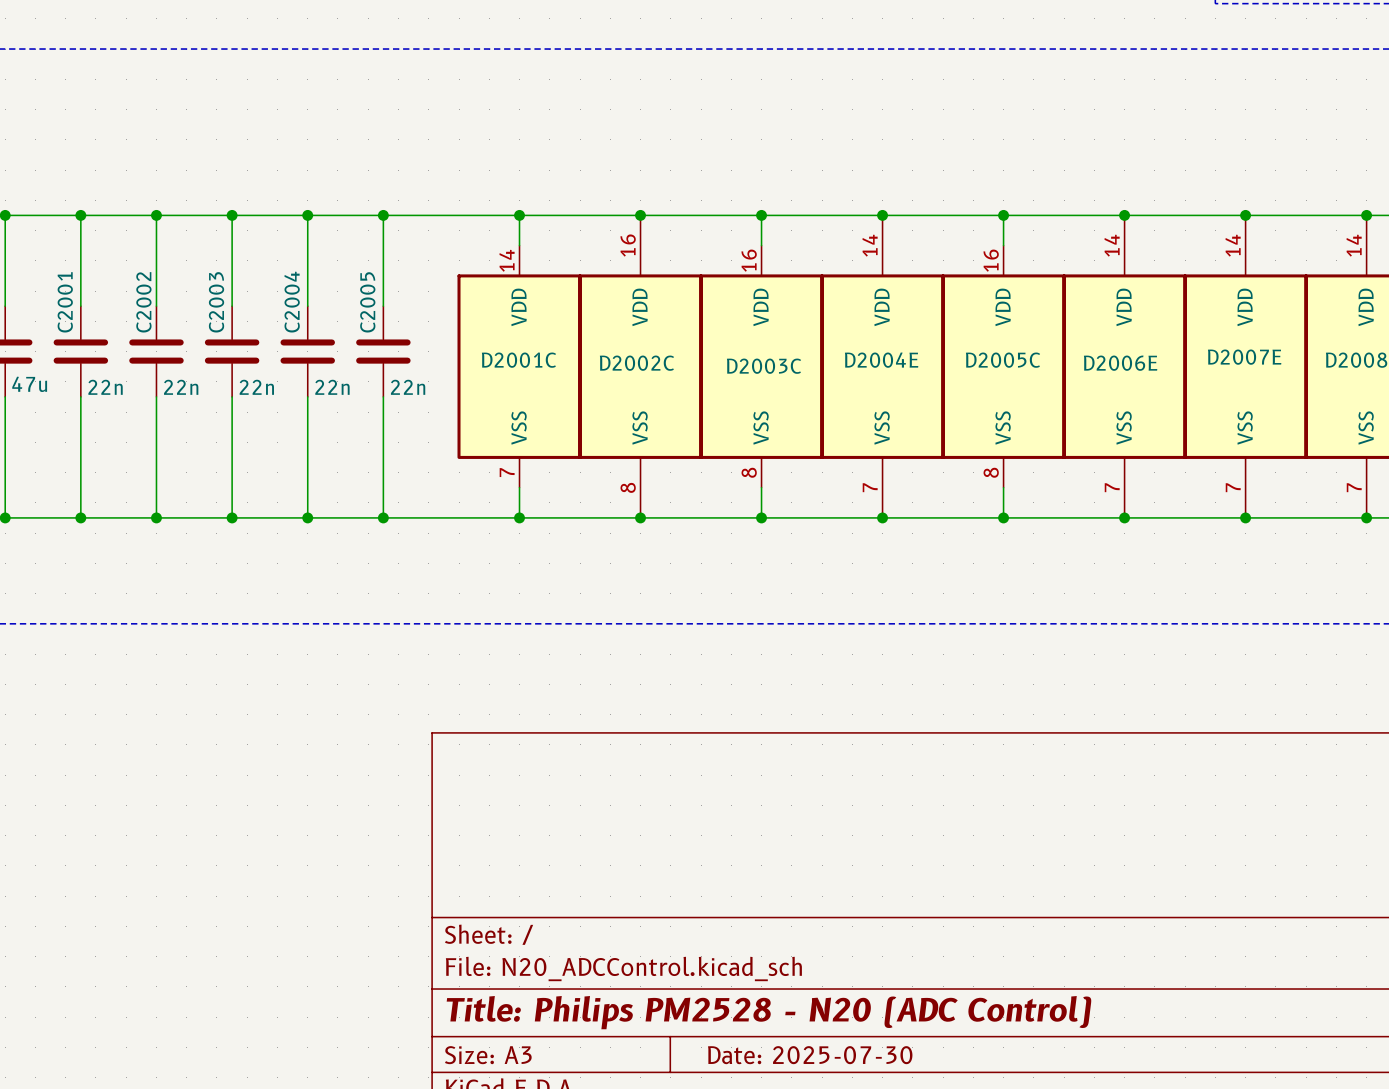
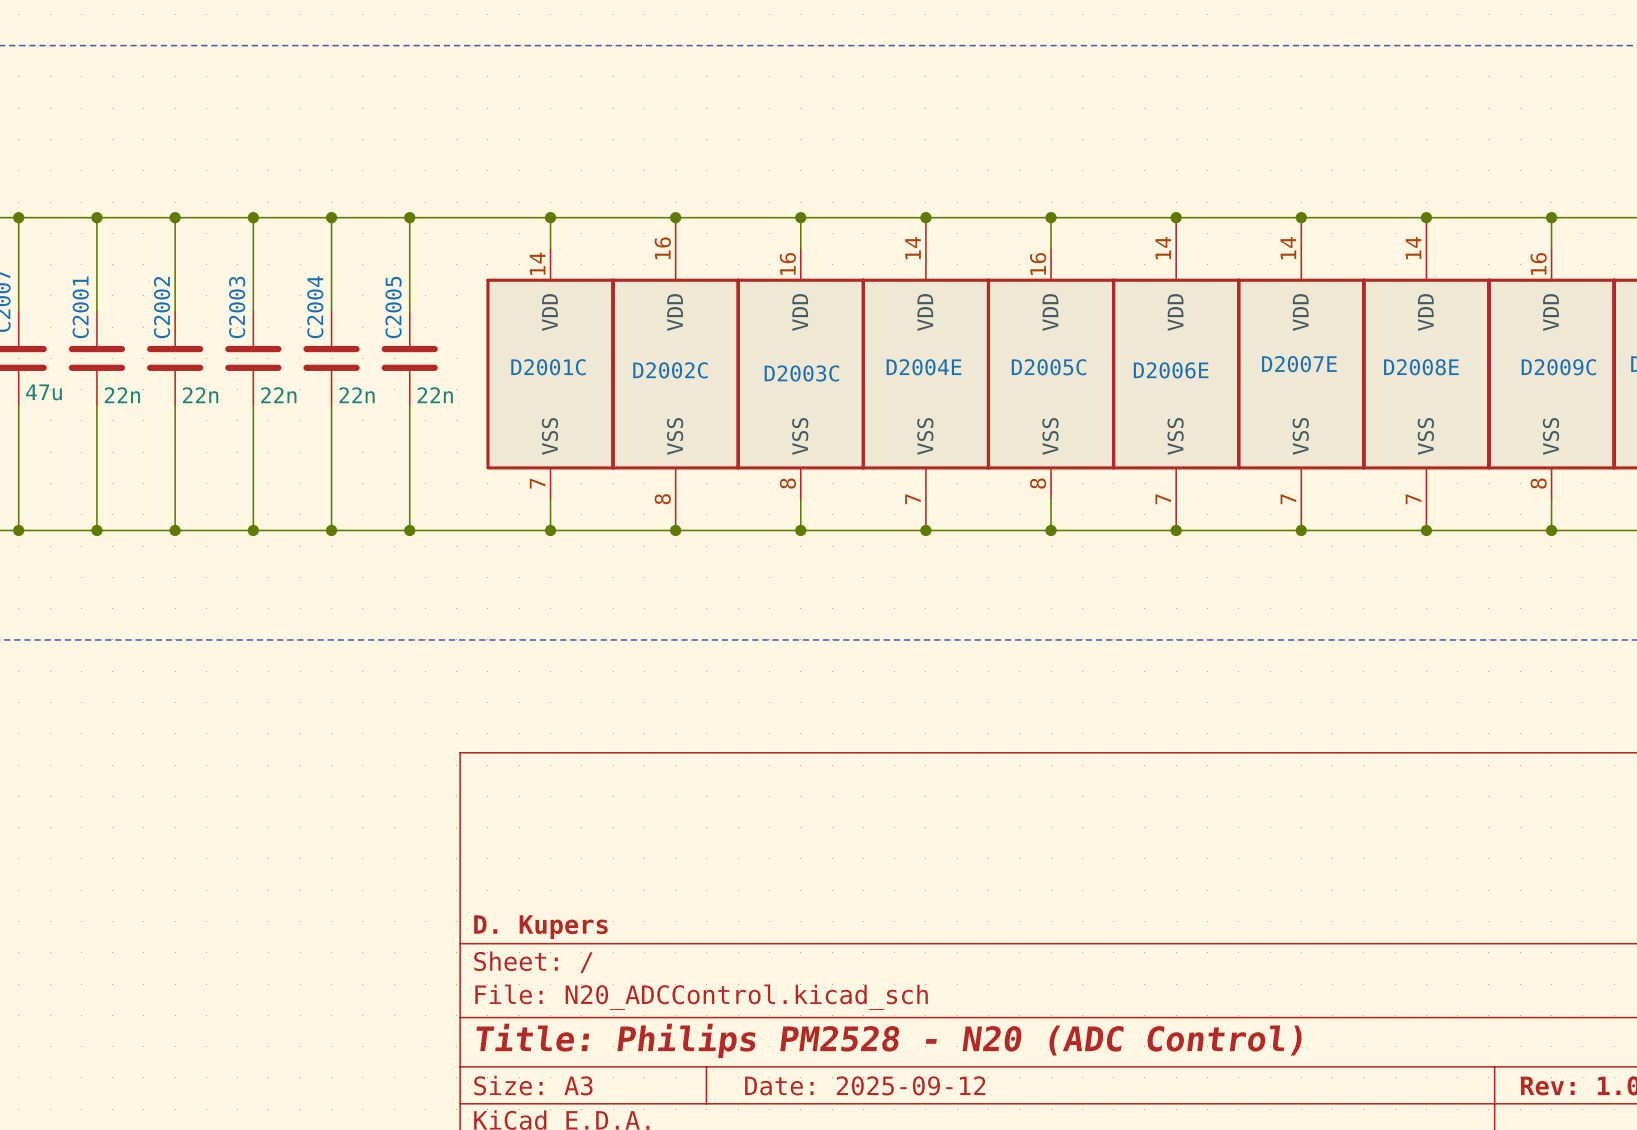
title block: none -> D. Kupers (540, 927)
title block: Date: 2025-07-30 (810, 1055) -> Date: 2025-09-12 (865, 1085)

